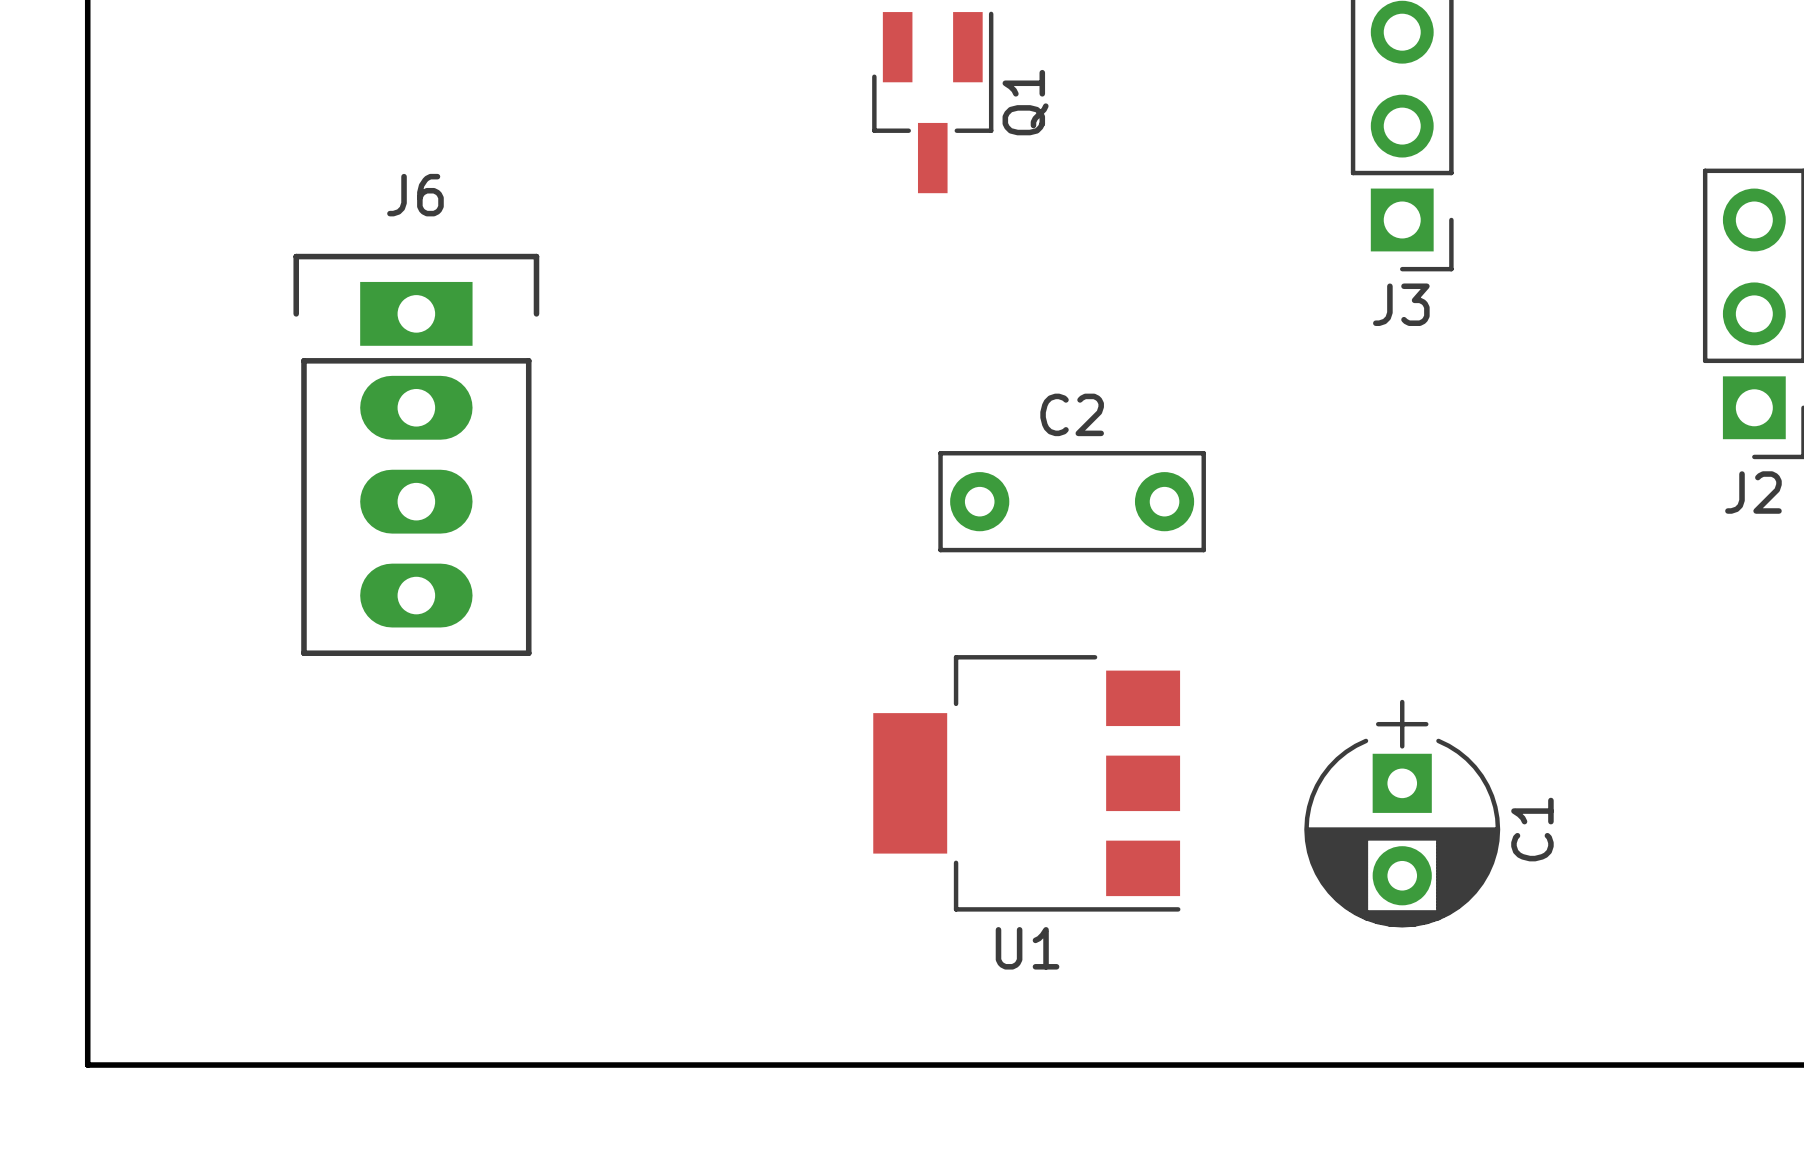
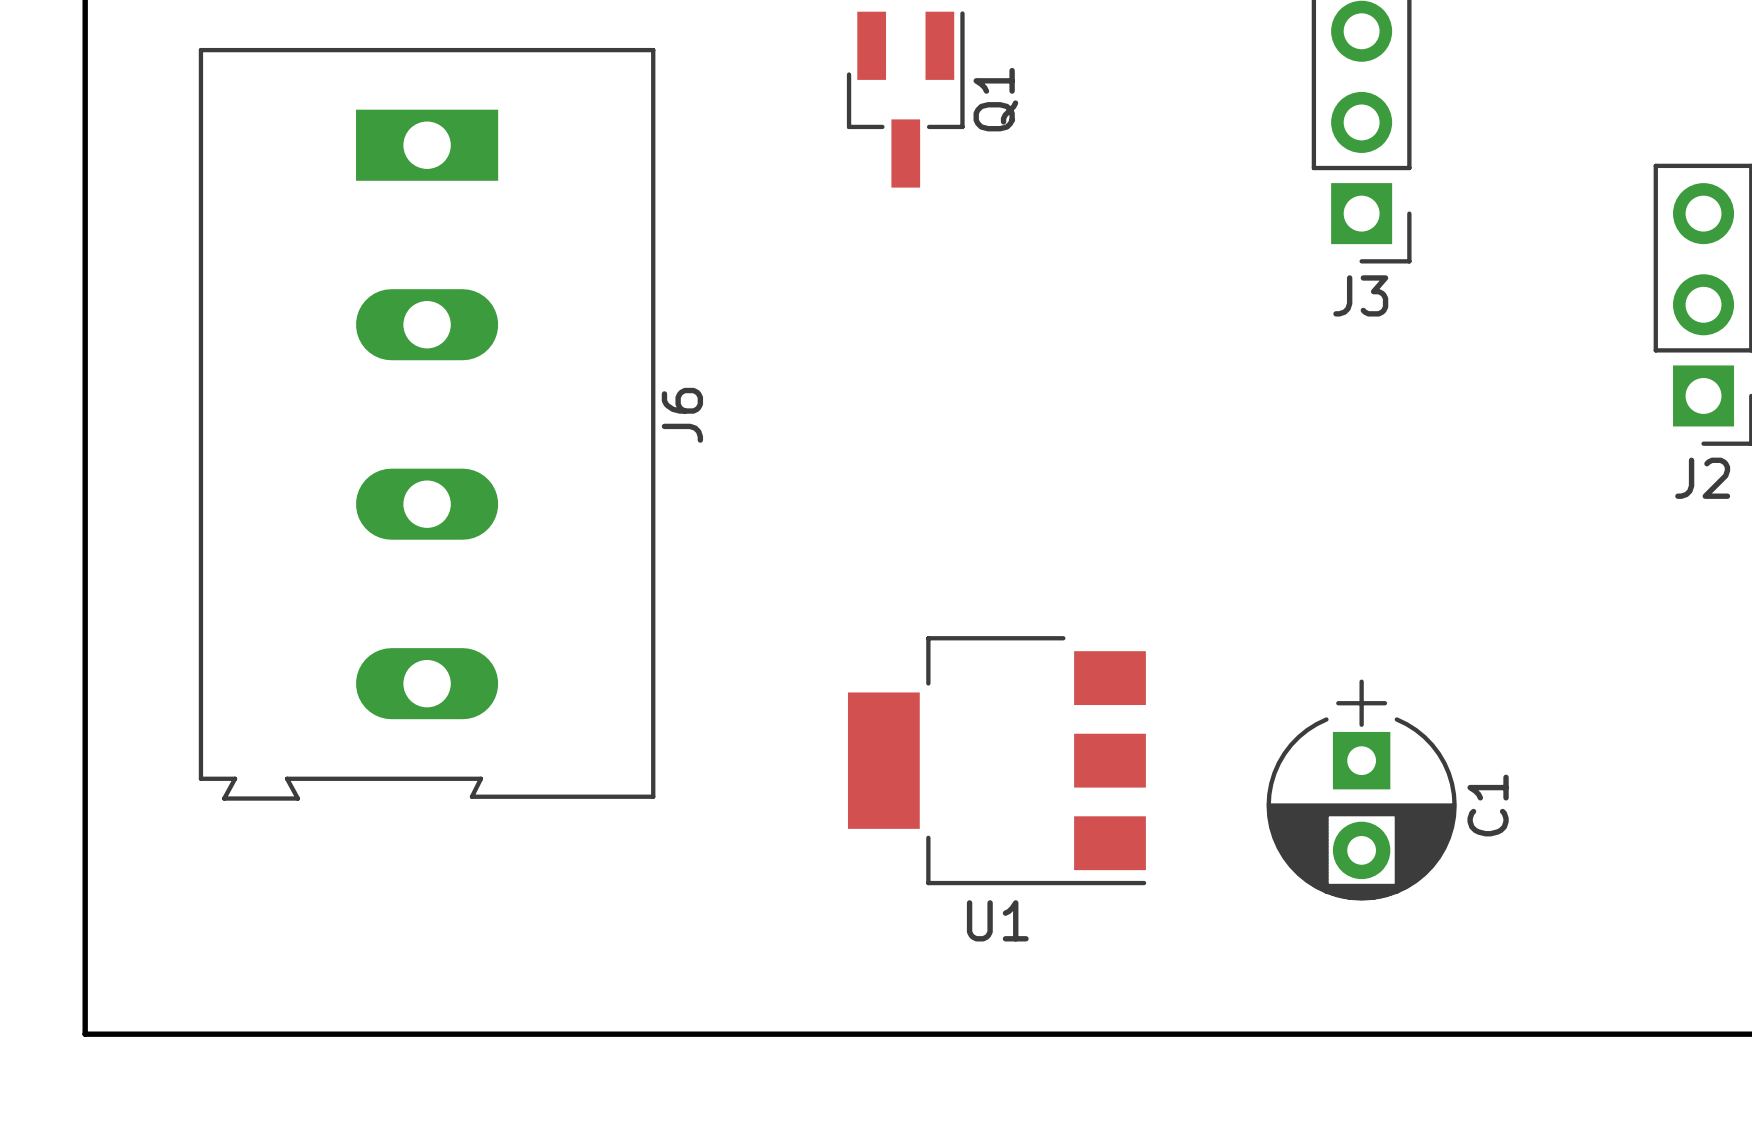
J6 name position: J6 (415, 195) -> J6 (682, 415)
J6 footprint: [293, 253, 540, 656] -> [198, 47, 656, 801]
C2: (1072, 501) -> none

